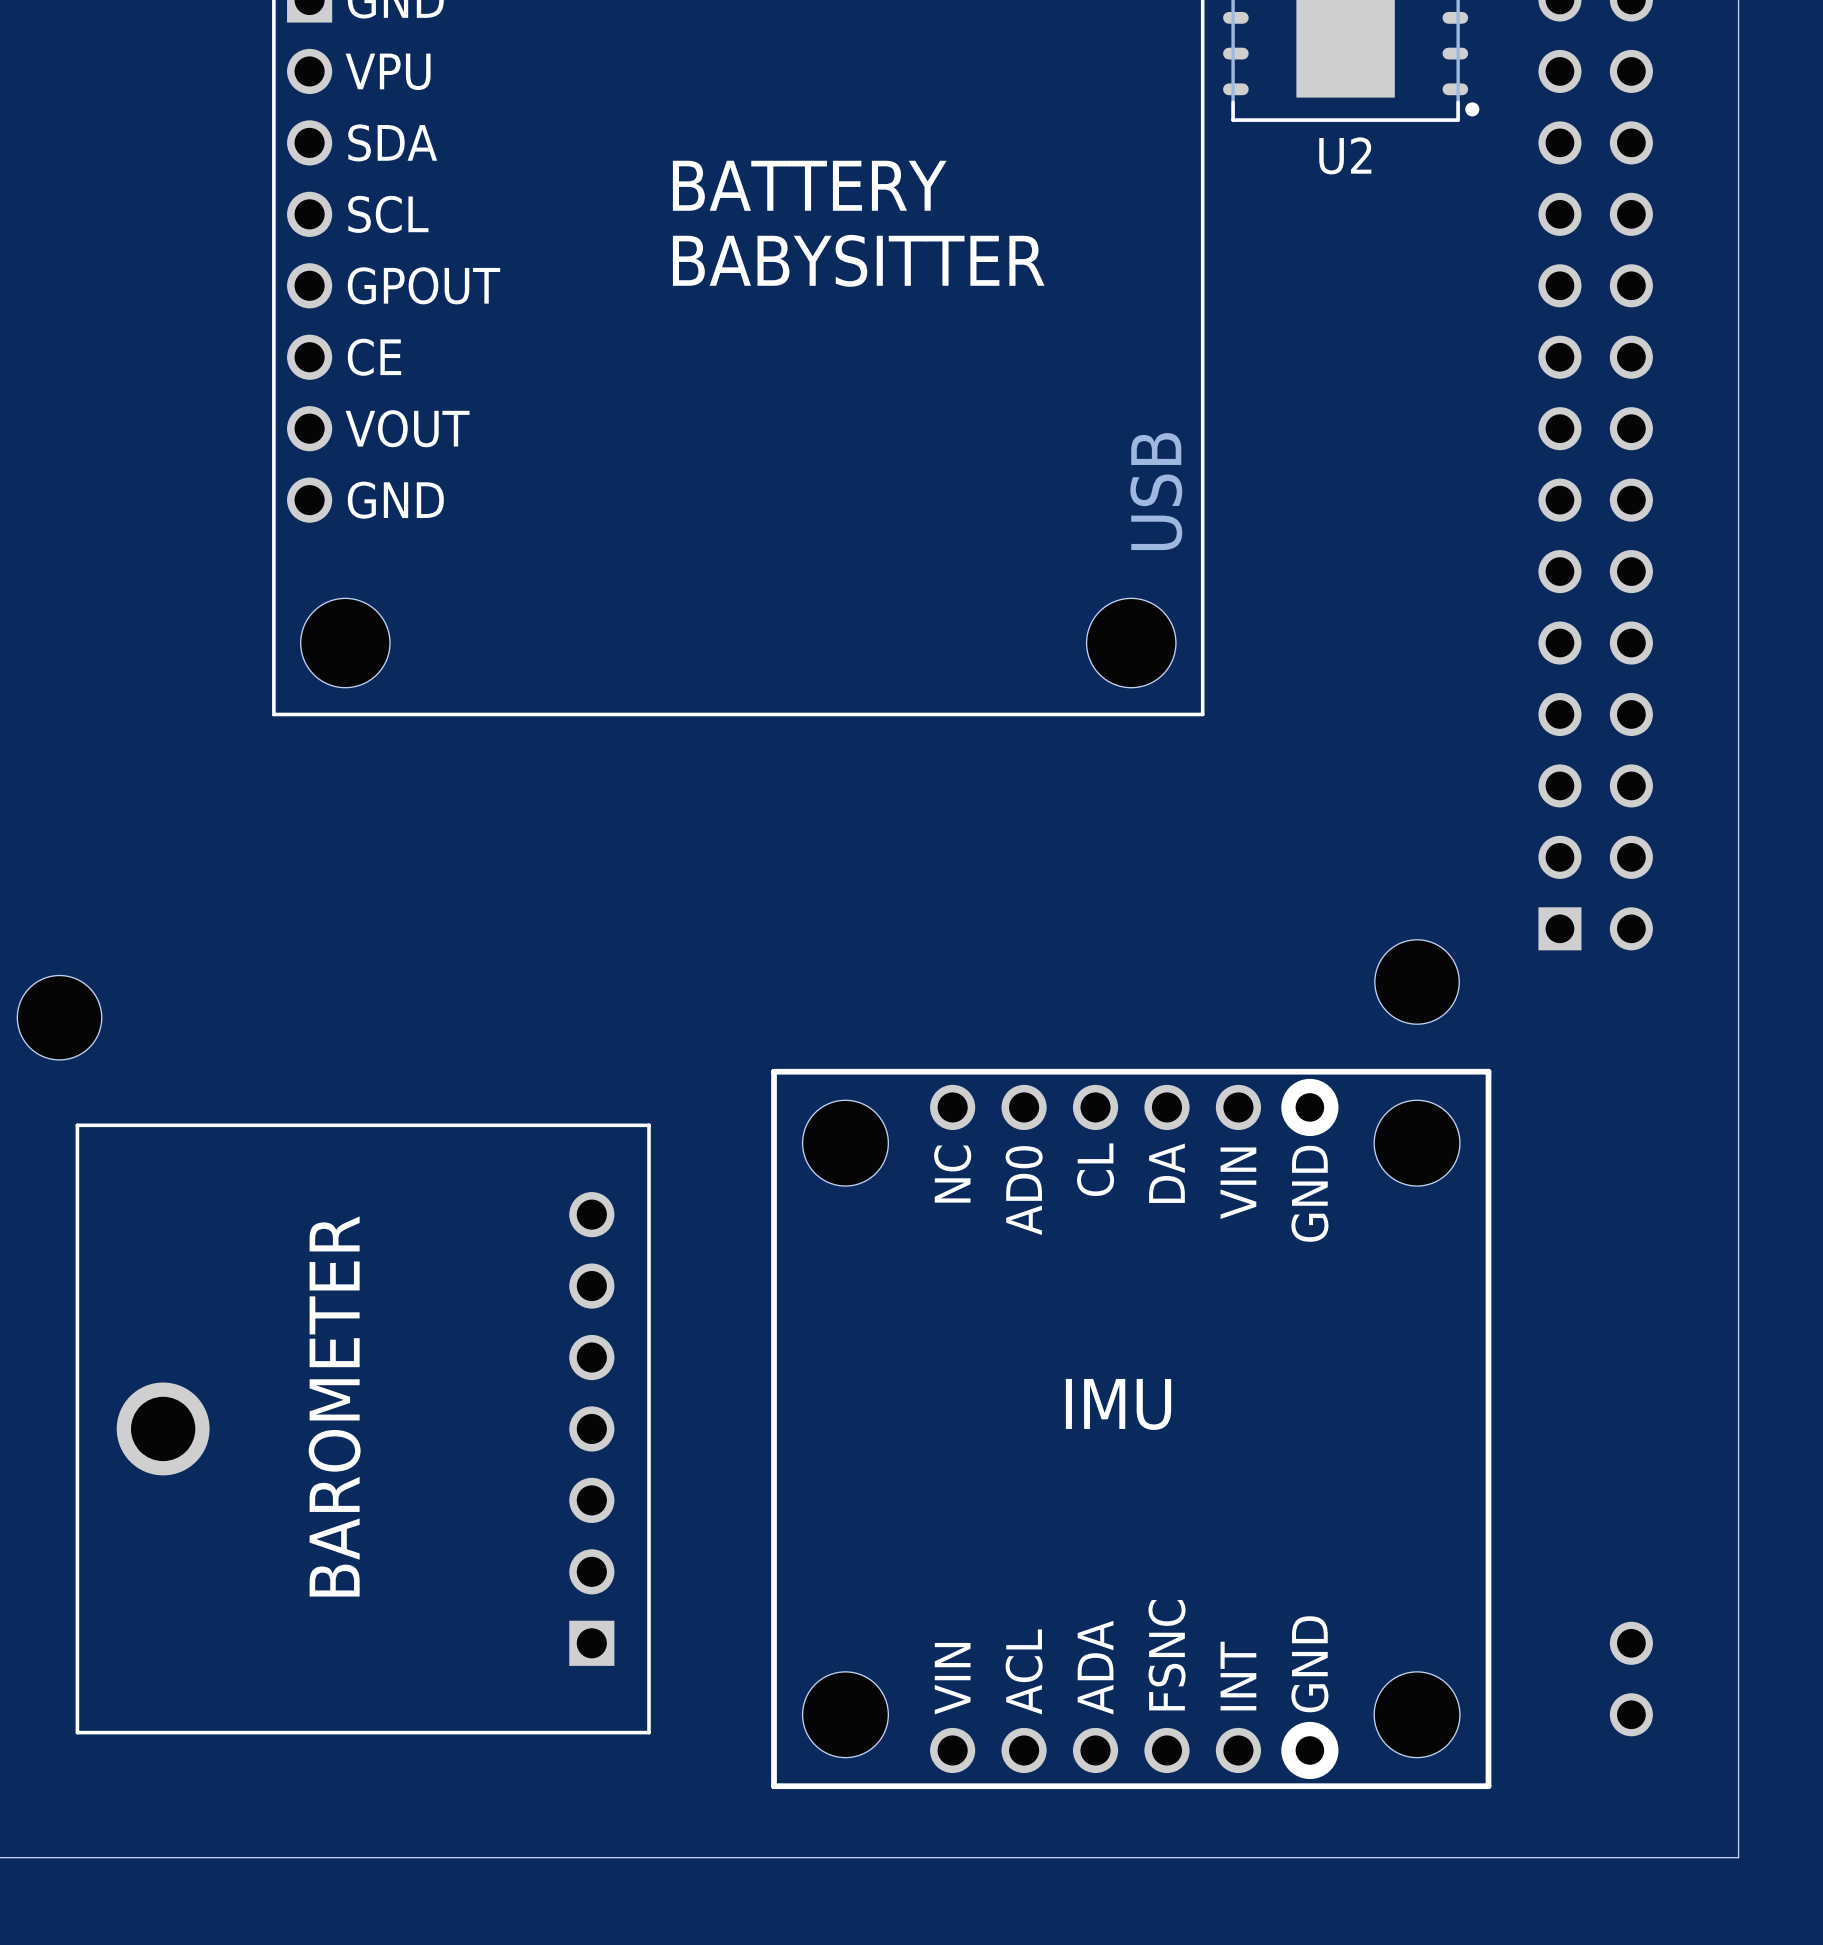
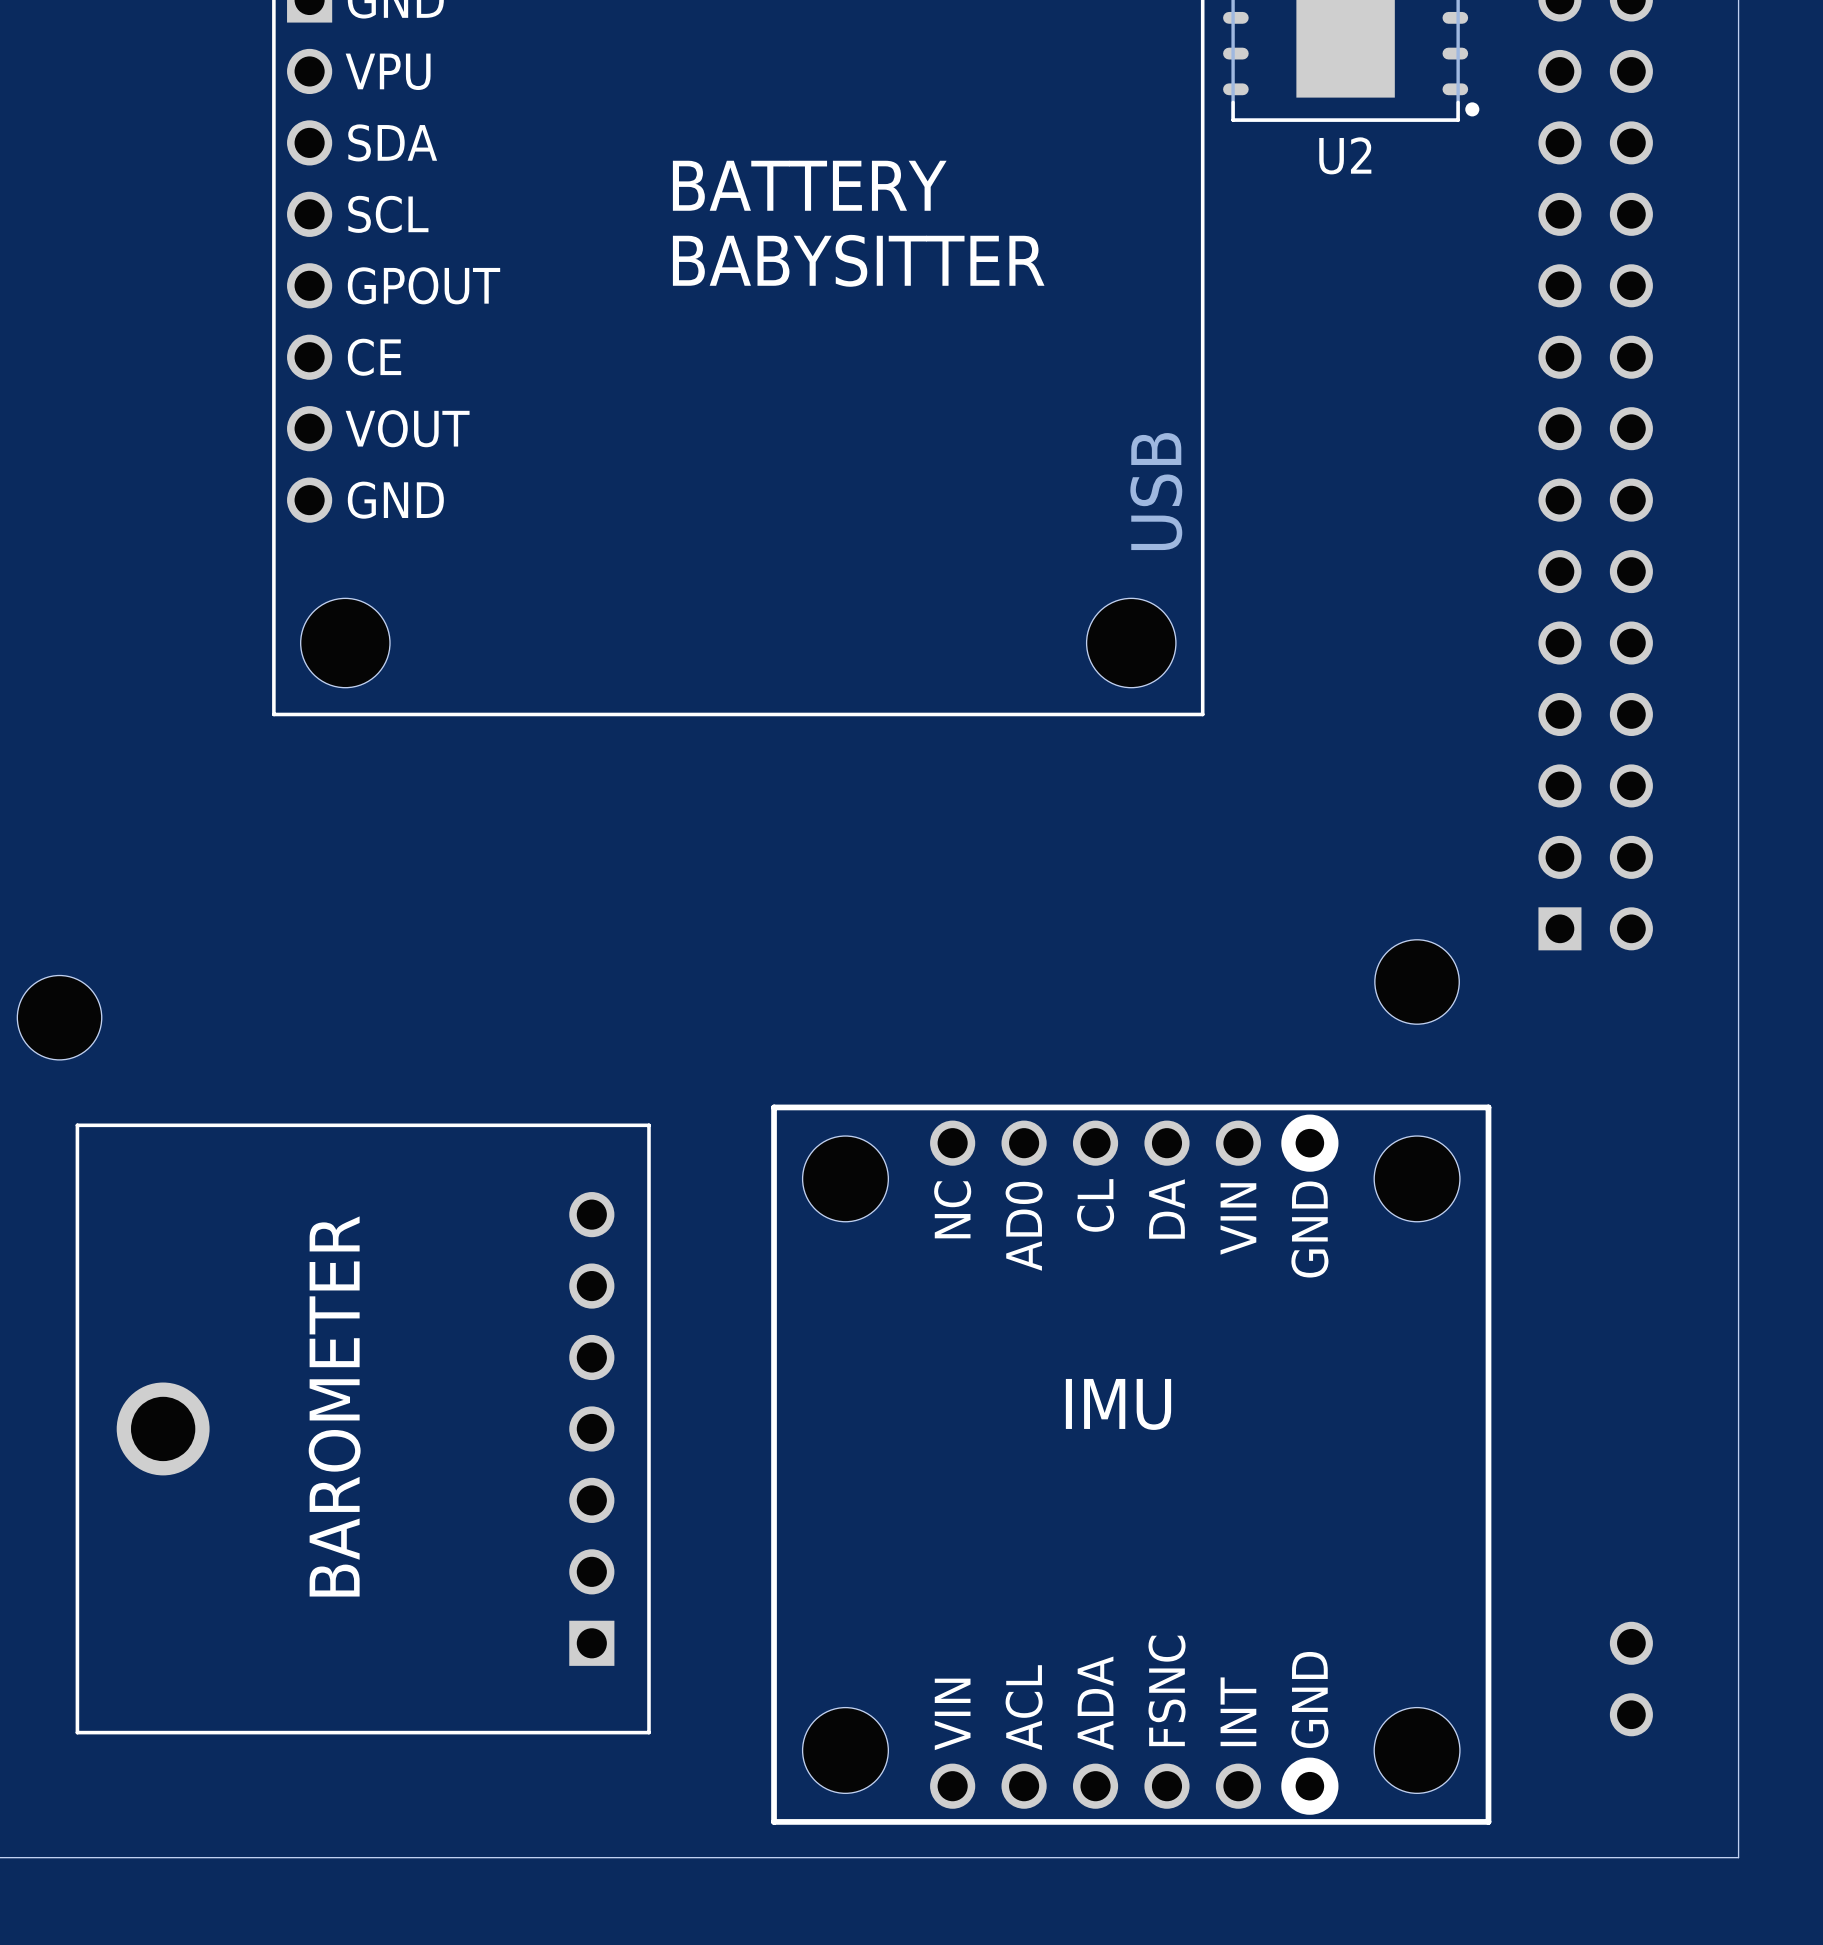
part position: (1131, 1428) -> (1131, 1464)

